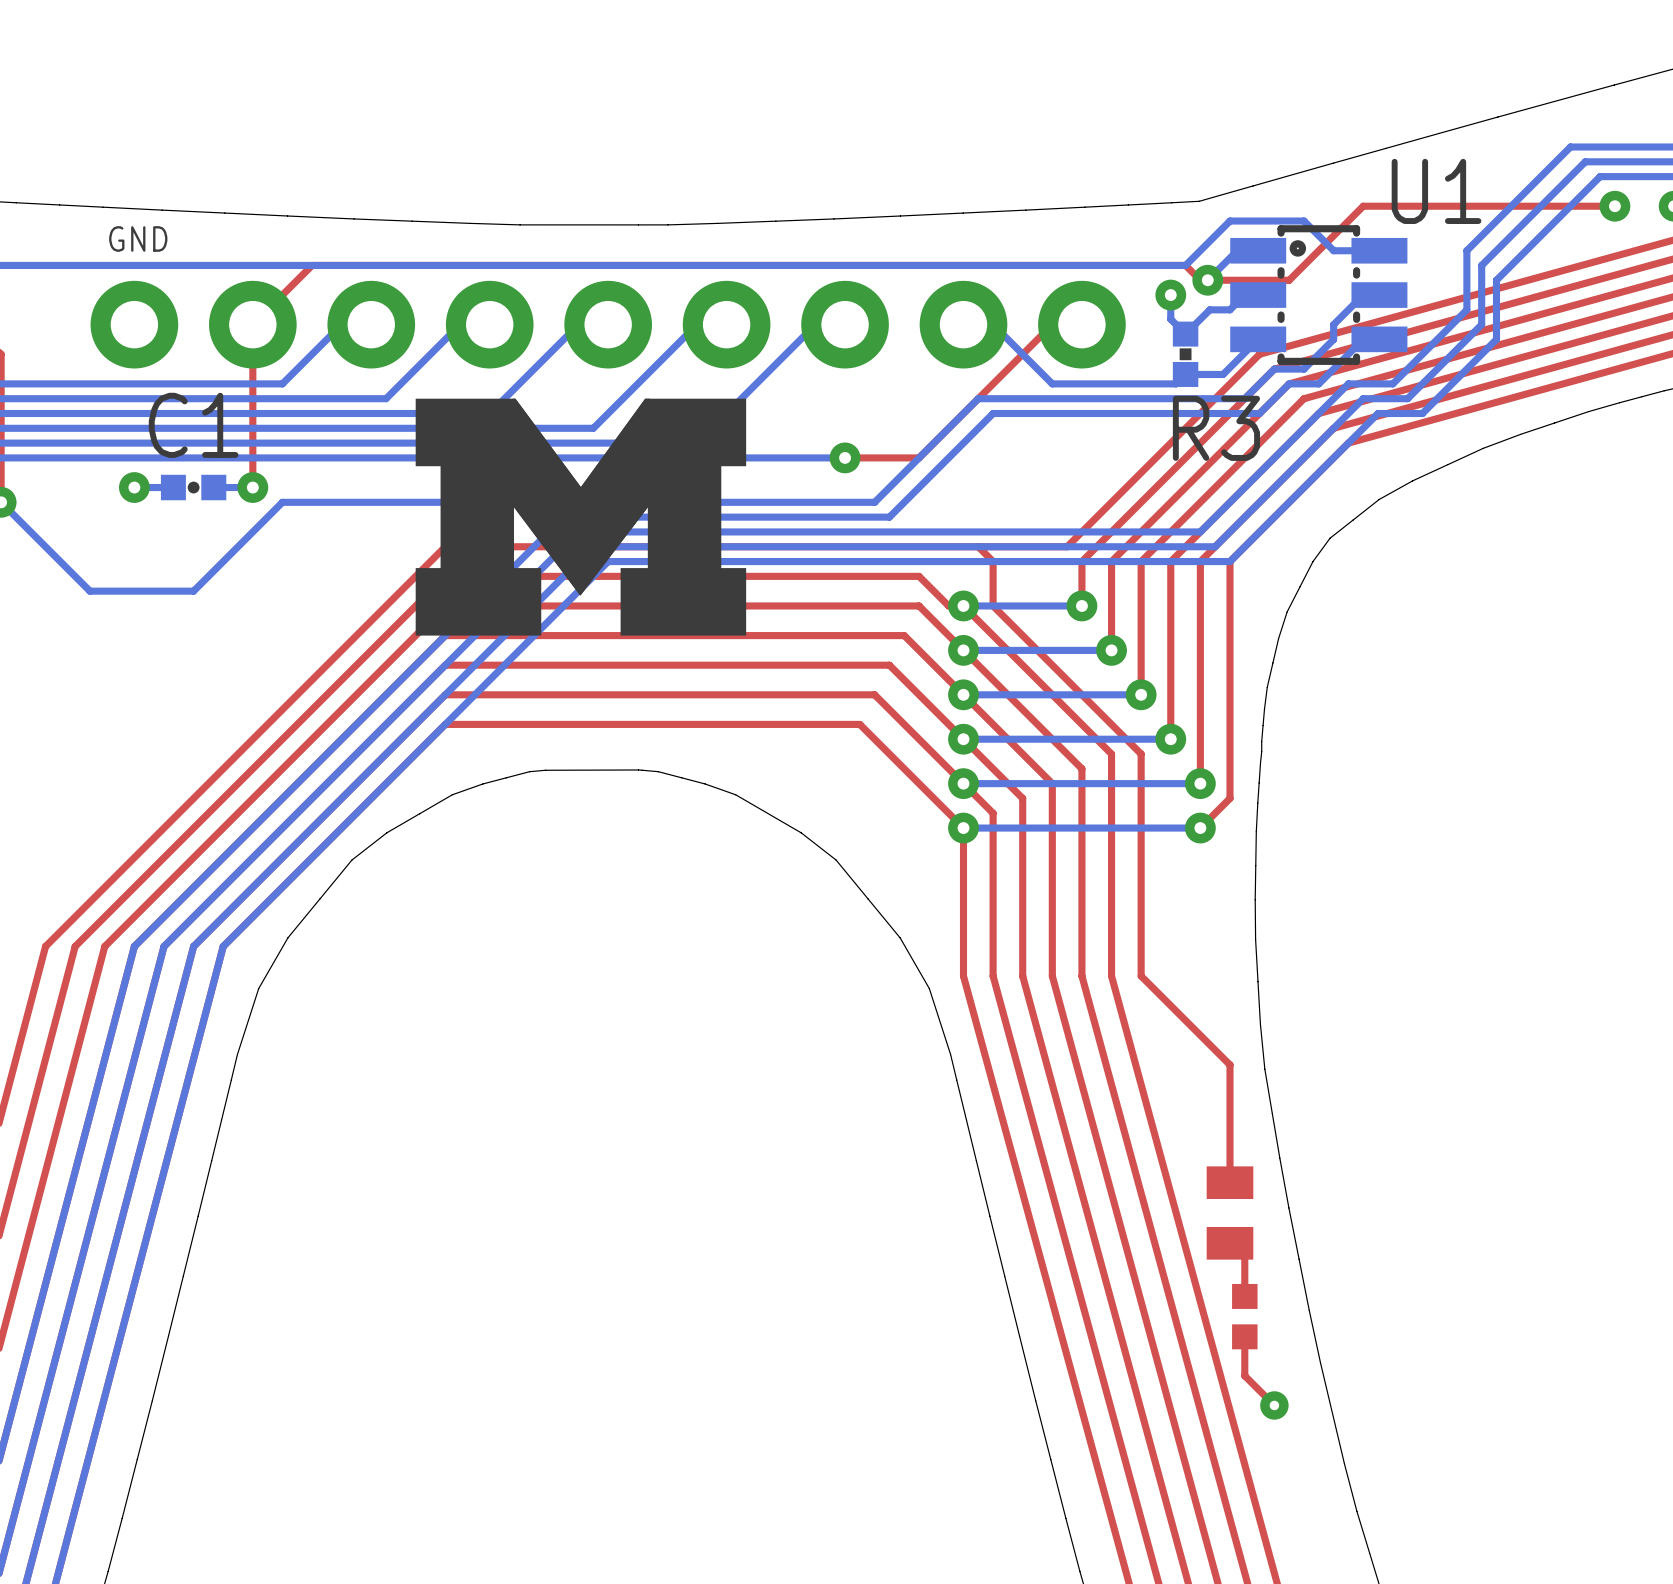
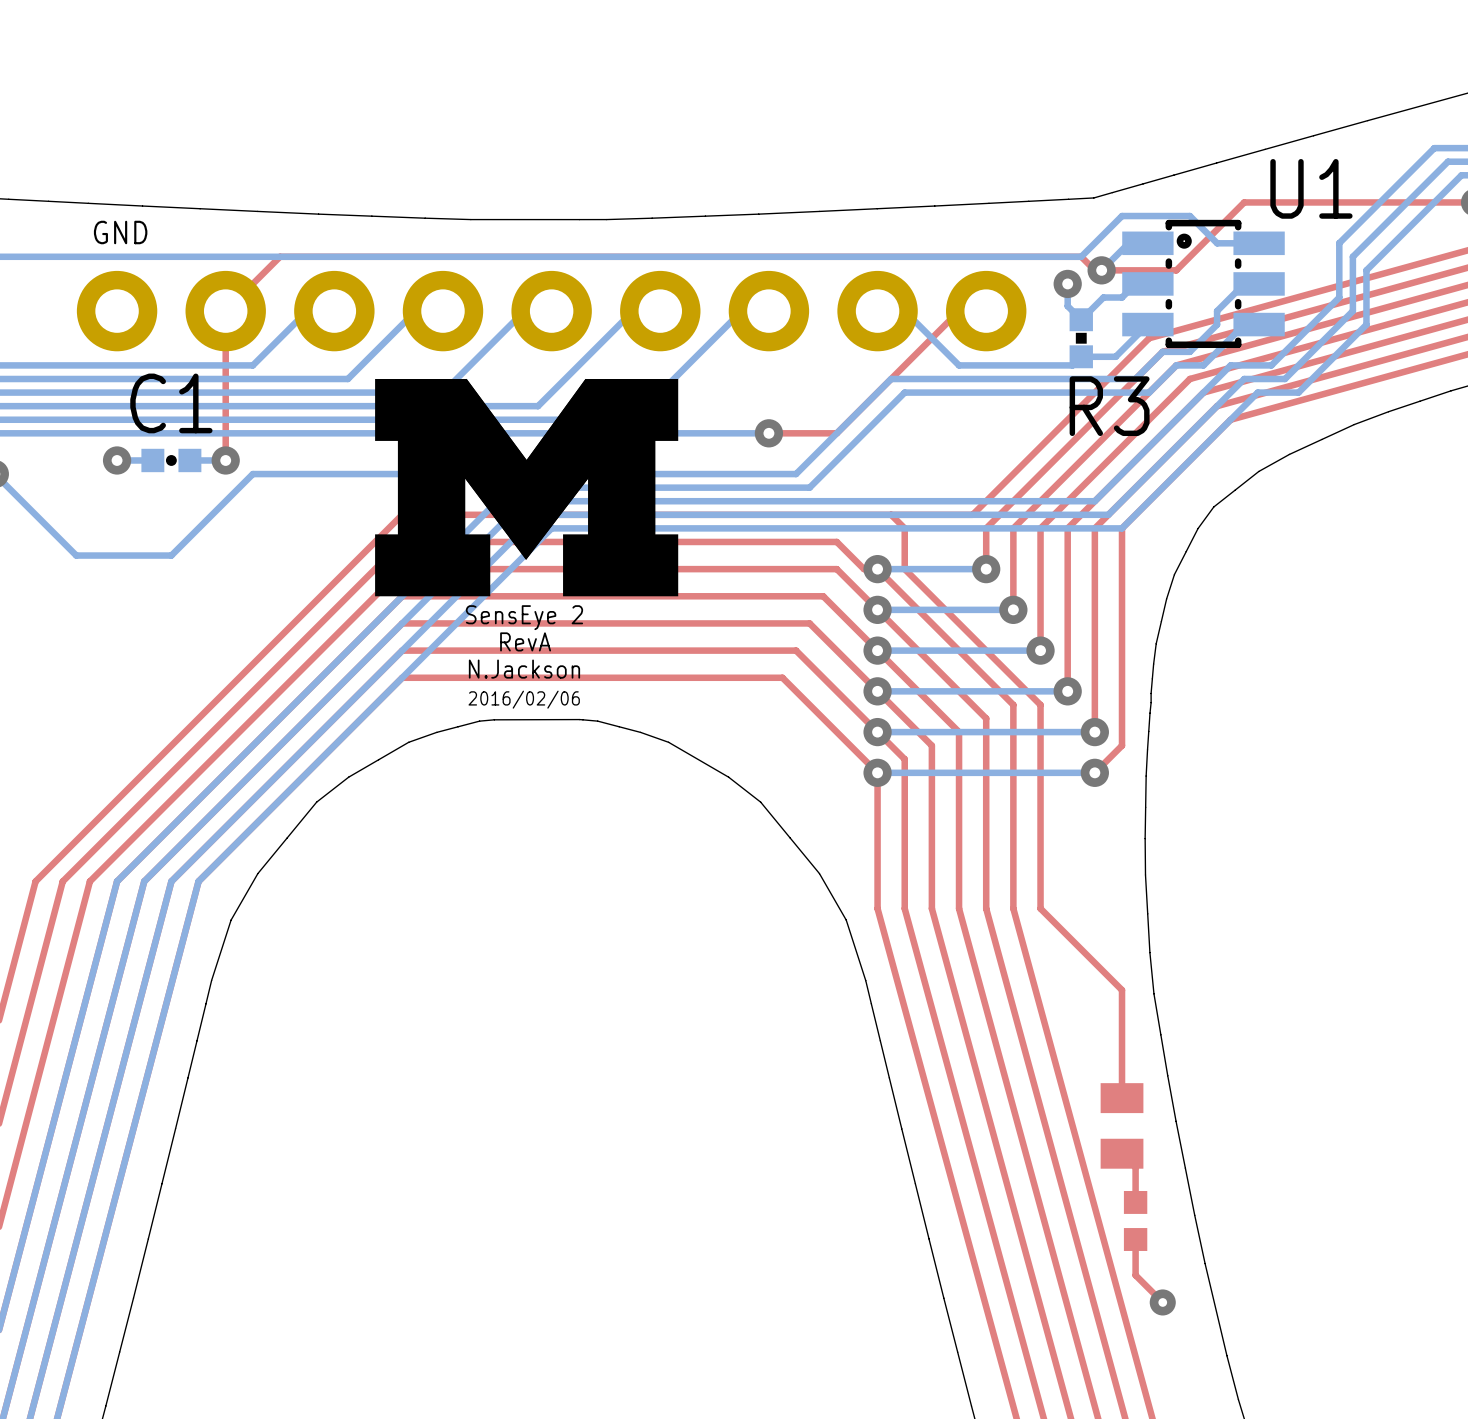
text: none -> SensEye 2 (524, 617)
text: none -> RevA (525, 641)
text: none -> N.Jackson (524, 669)
text: none -> 2016/02/06 (524, 699)

